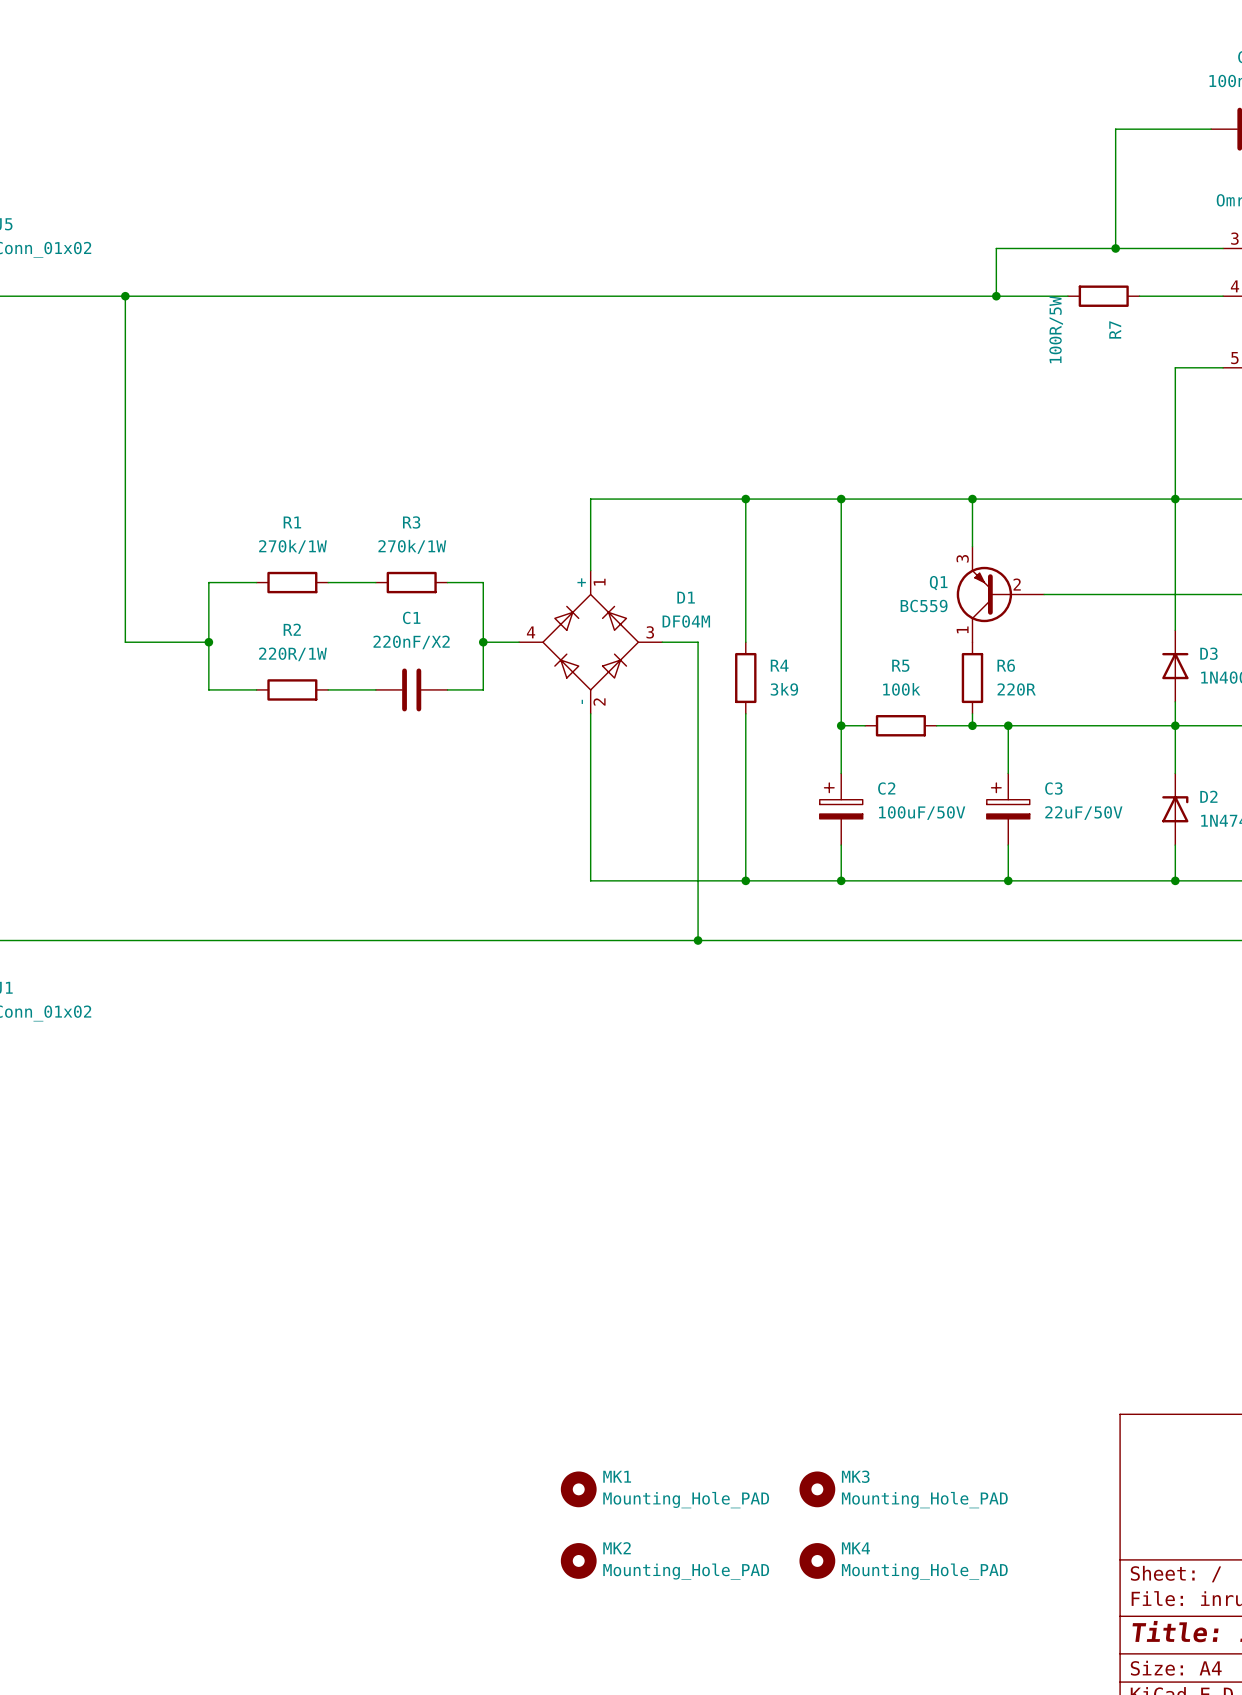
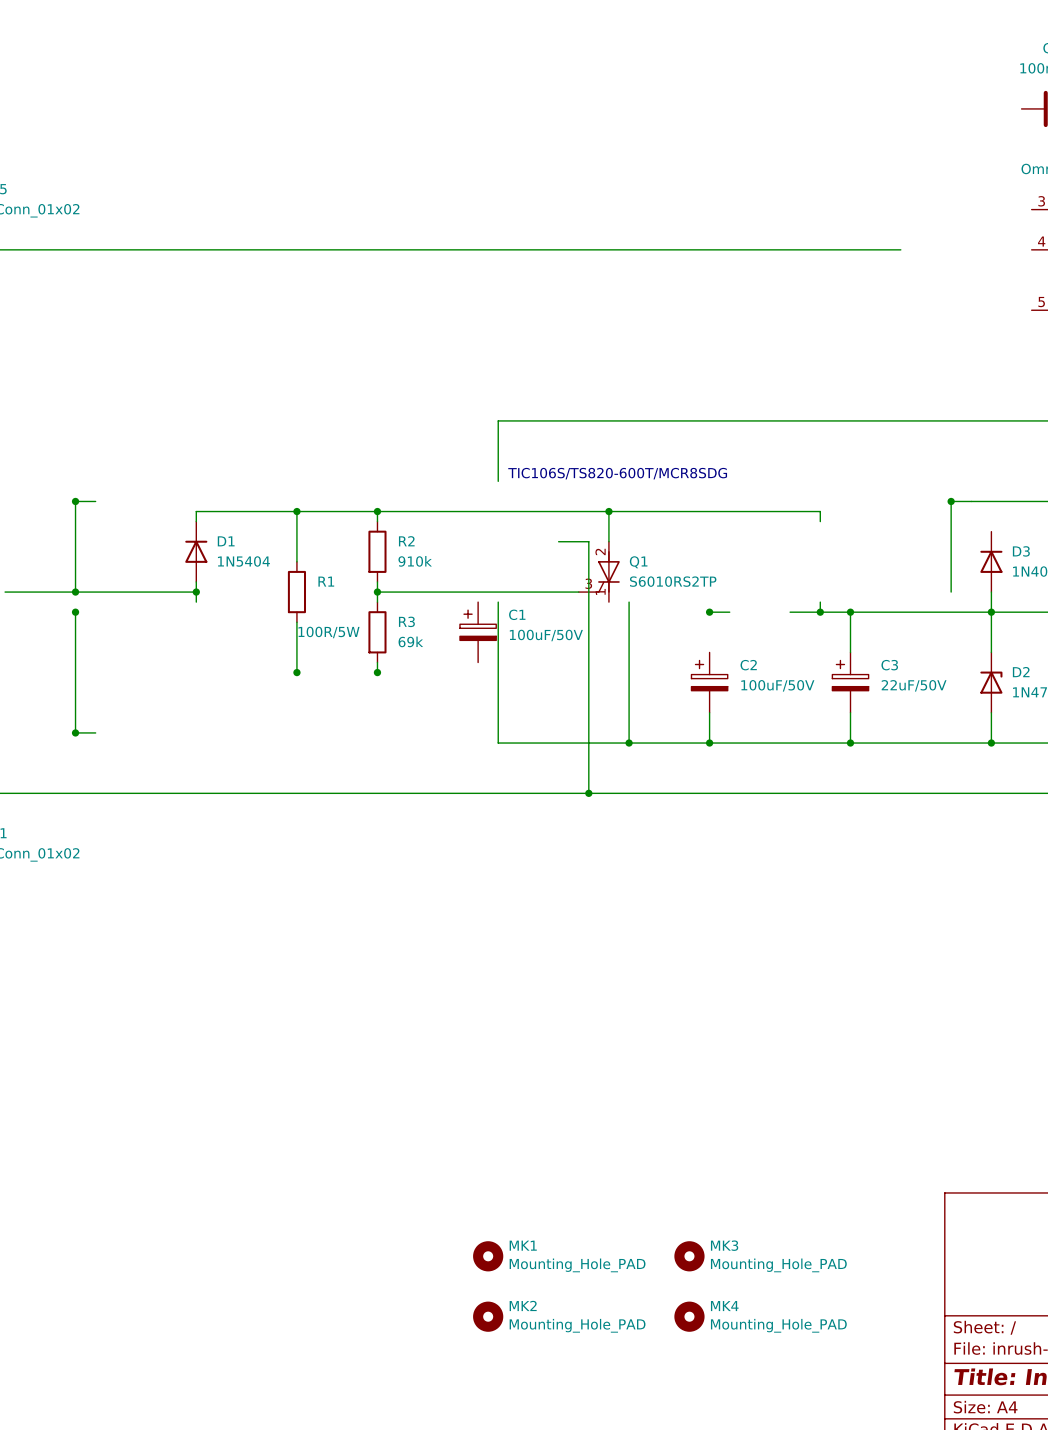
wire: (1211, 129) (1115, 129) (1115, 248) -> none
junction: (1115, 248) -> none
wire: (1223, 248) (996, 248) (996, 296) -> none
wire: (125, 296) (125, 642) (208, 642) -> none
junction: (125, 296) -> none
junction: (996, 296) -> none
R7: 100R/5W (1103, 296) -> none
wire: (1139, 296) (1223, 296) -> none
wire: (1223, 367) (1175, 367) (1175, 630) -> none
wire: (745, 499) (745, 642) -> none
junction: (745, 499) -> none
wire: (841, 499) (841, 773) -> none
junction: (841, 499) -> none
wire: (972, 499) (972, 546) -> none
junction: (972, 499) -> none
junction: (1175, 499) -> none
R1 name position: R1 (292, 522) -> R1 (326, 581)
R3 name position: R3 (411, 522) -> R3 (406, 621)
R1 value: 270k/1W (292, 546) -> 100R/5W (328, 632)
R3 value: 270k/1W (412, 546) -> 69k (410, 641)
Q1 symbol: [956, 546, 1045, 643] -> [578, 541, 620, 603]
text: none -> TIC106S/TS820-600T/MCR8SDG (617, 473)
D1 symbol: [519, 570, 663, 714] -> [185, 521, 208, 582]
wire: (256, 582) (208, 582) (208, 689) (256, 689) -> none
R1 rotation: 0° (292, 582) -> 90° clockwise (296, 592)
R1 position: (292, 582) -> (296, 592)
wire: (328, 582) (375, 582) -> none
R3 rotation: 0° (411, 582) -> 90° clockwise (377, 632)
R3 position: (411, 582) -> (377, 632)
wire: (447, 582) (483, 582) (483, 689) (447, 689) -> (377, 602) (377, 581)
Q1 name position: Q1 (938, 583) -> Q1 (638, 562)
junction: none -> (75, 501)
wire: none -> (95, 501) (75, 501) (75, 592)
wire: (1044, 594) (1127, 594) -> (951, 592) (951, 501)
junction: none -> (951, 501)
D1 name position: D1 (686, 597) -> D1 (226, 541)
Q1 value: BC559 (924, 605) -> S6010RS2TP (673, 581)
wire: none -> (296, 511) (296, 561)
junction: none -> (296, 511)
wire: none -> (377, 511) (377, 521)
junction: none -> (377, 511)
wire: none -> (608, 511) (608, 541)
junction: none -> (608, 511)
C1 name position: C1 (411, 617) -> C1 (517, 614)
wire: none -> (196, 521) (196, 511) (820, 511) (820, 521)
D1 value: DF04M (686, 621) -> 1N5404 (243, 561)
R2 name position: R2 (292, 629) -> R2 (406, 541)
junction: (208, 642) -> none
C1 value: 220nF/X2 (411, 642) -> 100uF/50V (546, 635)
wire: (483, 642) (519, 642) -> none
junction: (483, 642) -> none
R2 value: 220R/1W (292, 654) -> 910k (415, 561)
C1 symbol: [375, 668, 448, 712] -> [459, 602, 497, 663]
R4: 3k9 (745, 678) -> none
R6: 220R (972, 678) -> none
wire: none -> (196, 581) (196, 602)
R2 rotation: 0° (292, 689) -> 90° clockwise (377, 551)
R2 position: (292, 689) -> (377, 551)
wire: (328, 689) (375, 689) -> none
wire: none -> (5, 592) (196, 592)
junction: none -> (75, 592)
junction: none -> (196, 592)
wire: none -> (377, 592) (578, 592)
junction: none -> (377, 592)
wire: none -> (75, 612) (75, 732) (95, 732)
junction: none -> (75, 612)
R5: 100k (900, 725) -> none
wire: none -> (296, 622) (296, 672)
wire: none -> (377, 662) (377, 672)
junction: none -> (296, 672)
junction: none -> (377, 672)
junction: none -> (75, 732)

